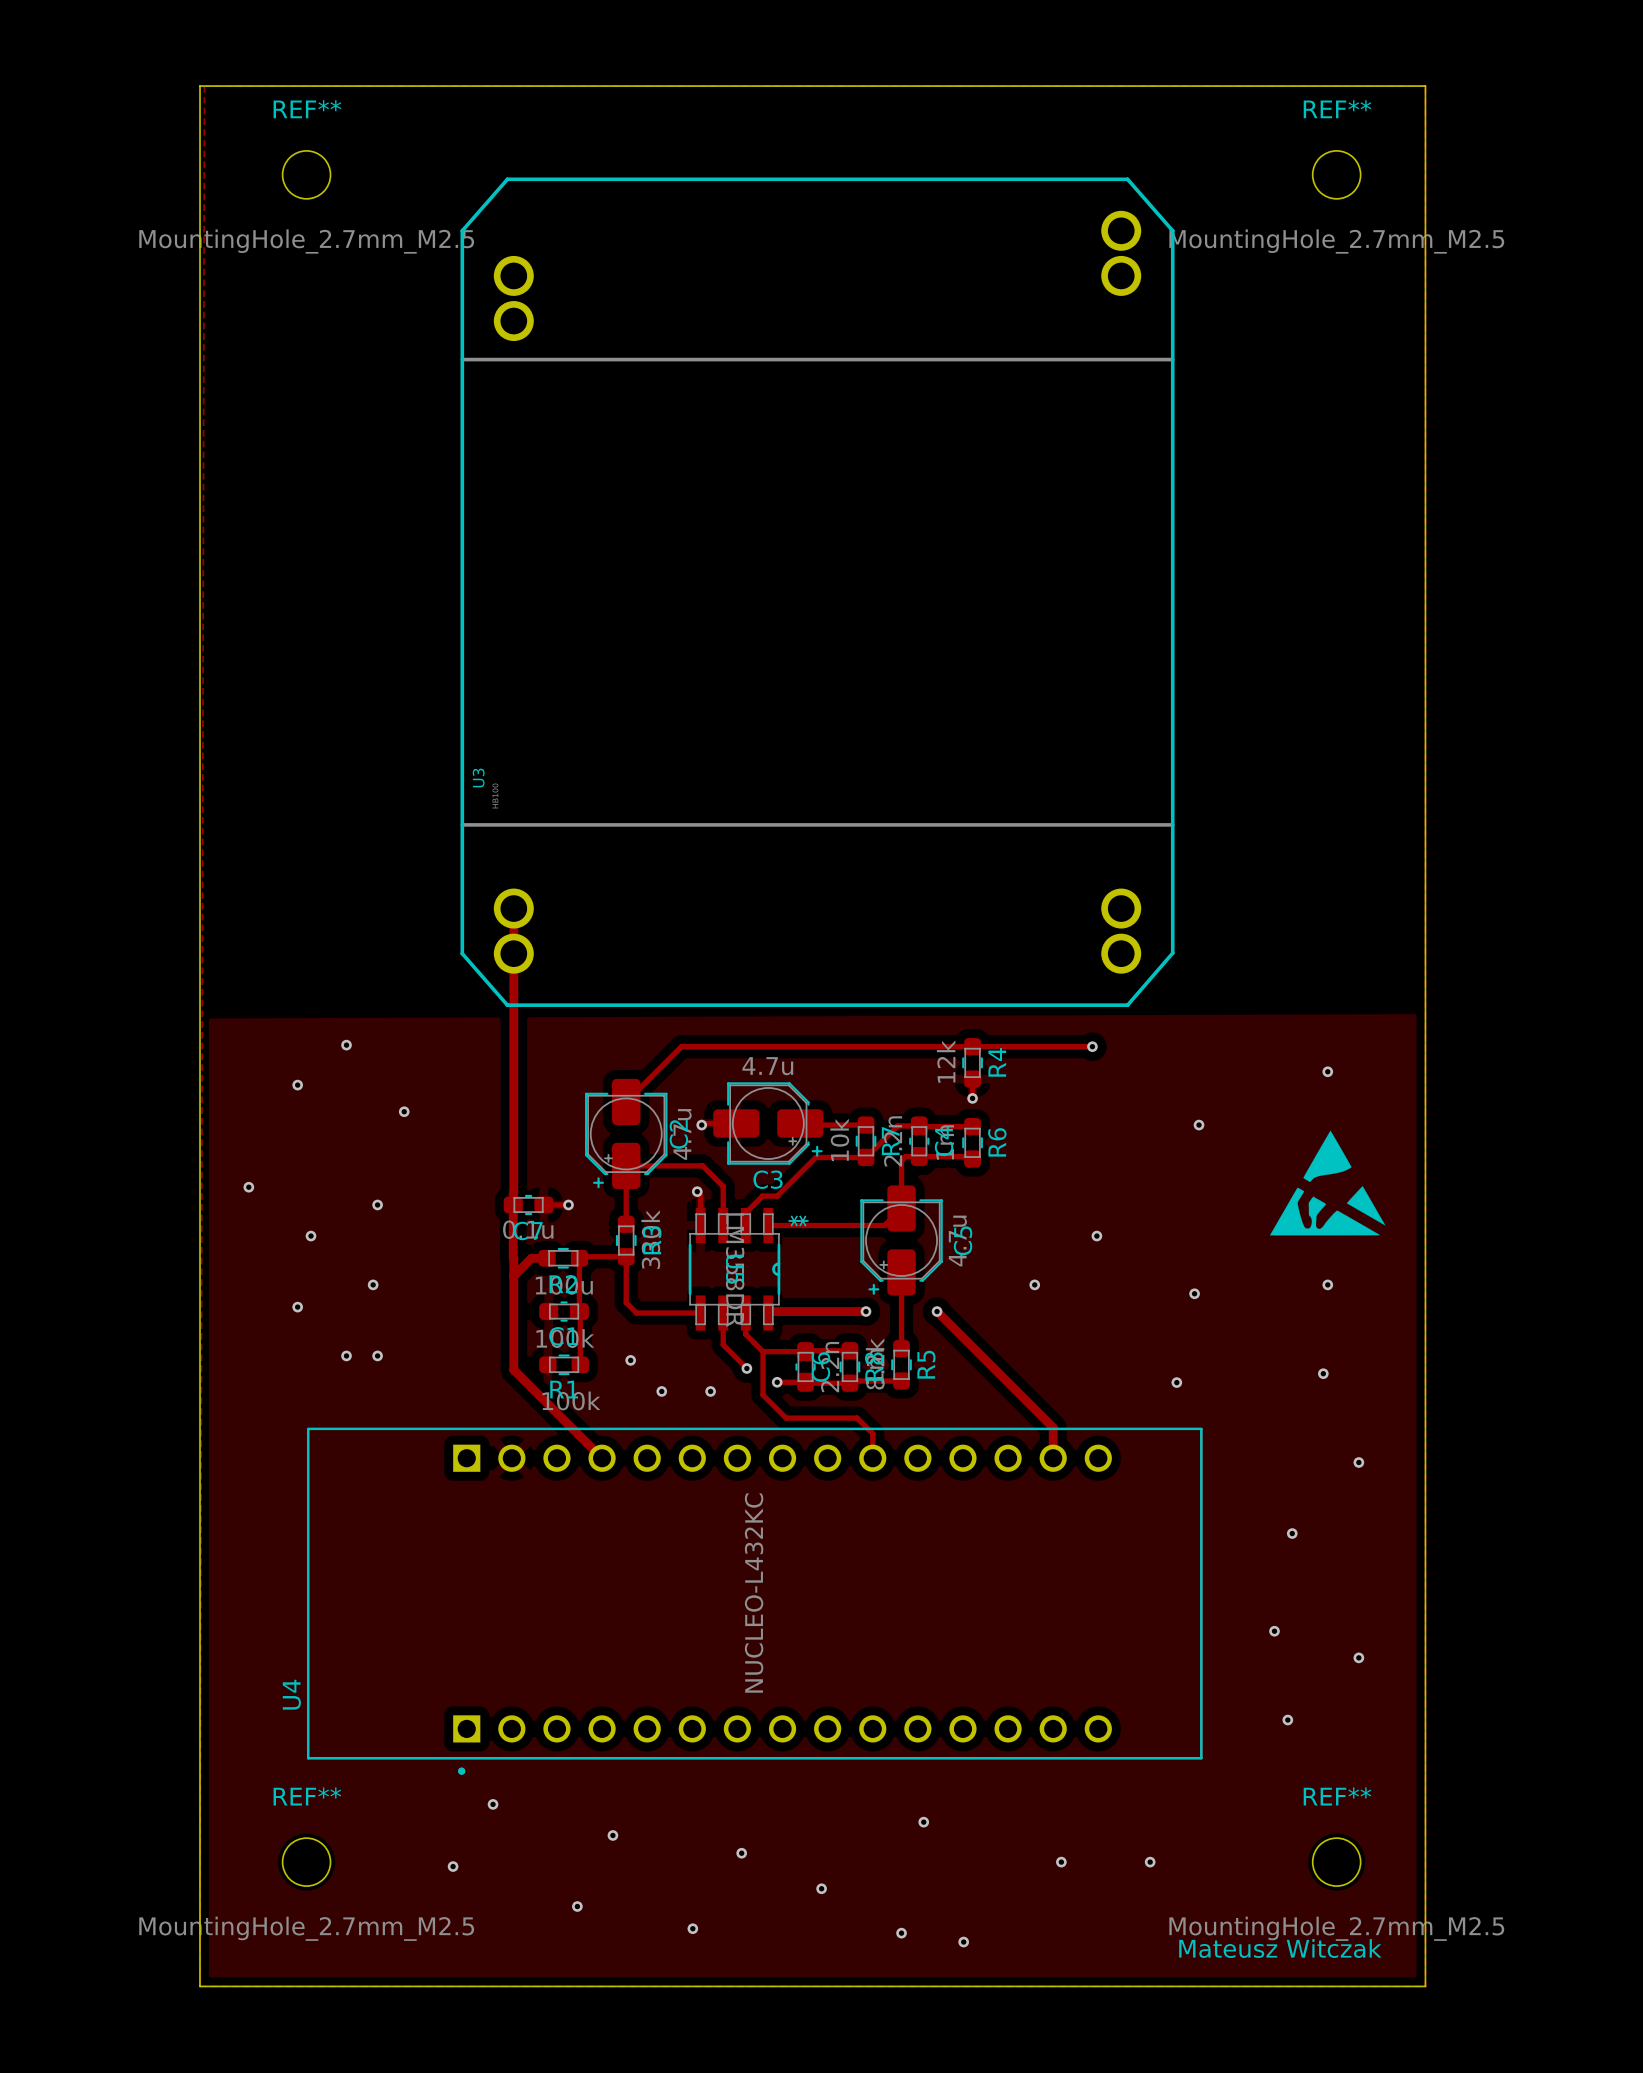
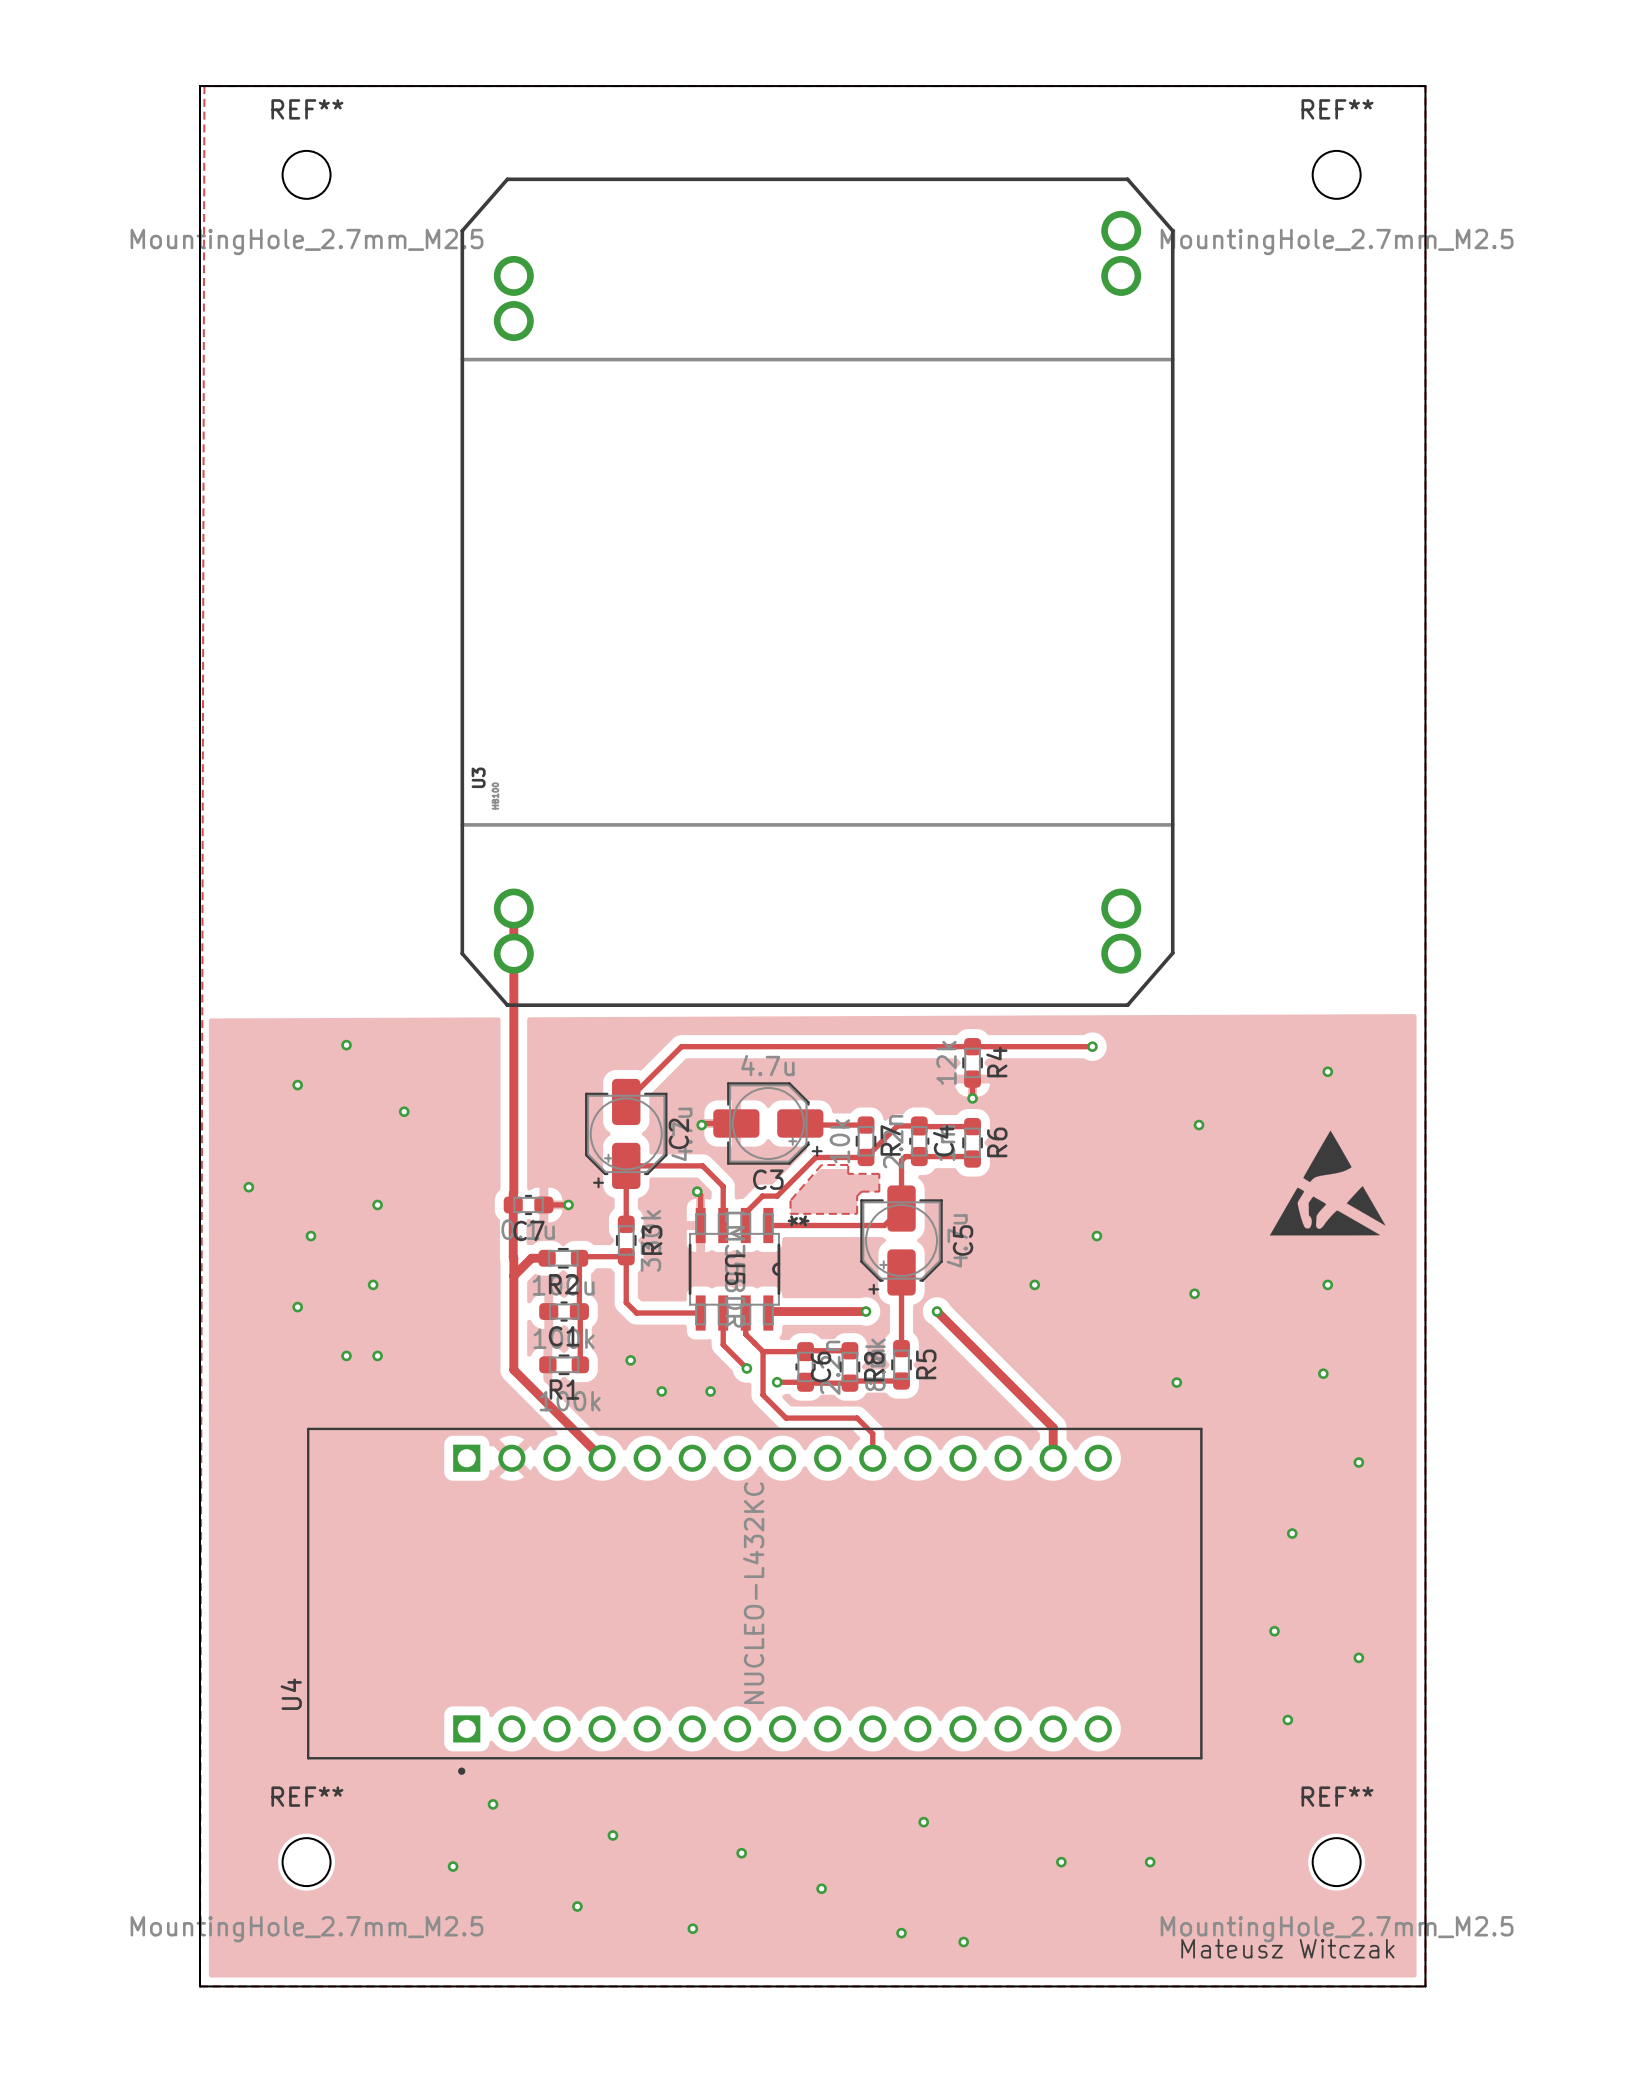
zone outline: none -> (821, 1165) (848, 1165) (848, 1173) (879, 1173) (879, 1191) (861, 1191) (857, 1196) (857, 1213) (790, 1213) (790, 1200) (821, 1165)

